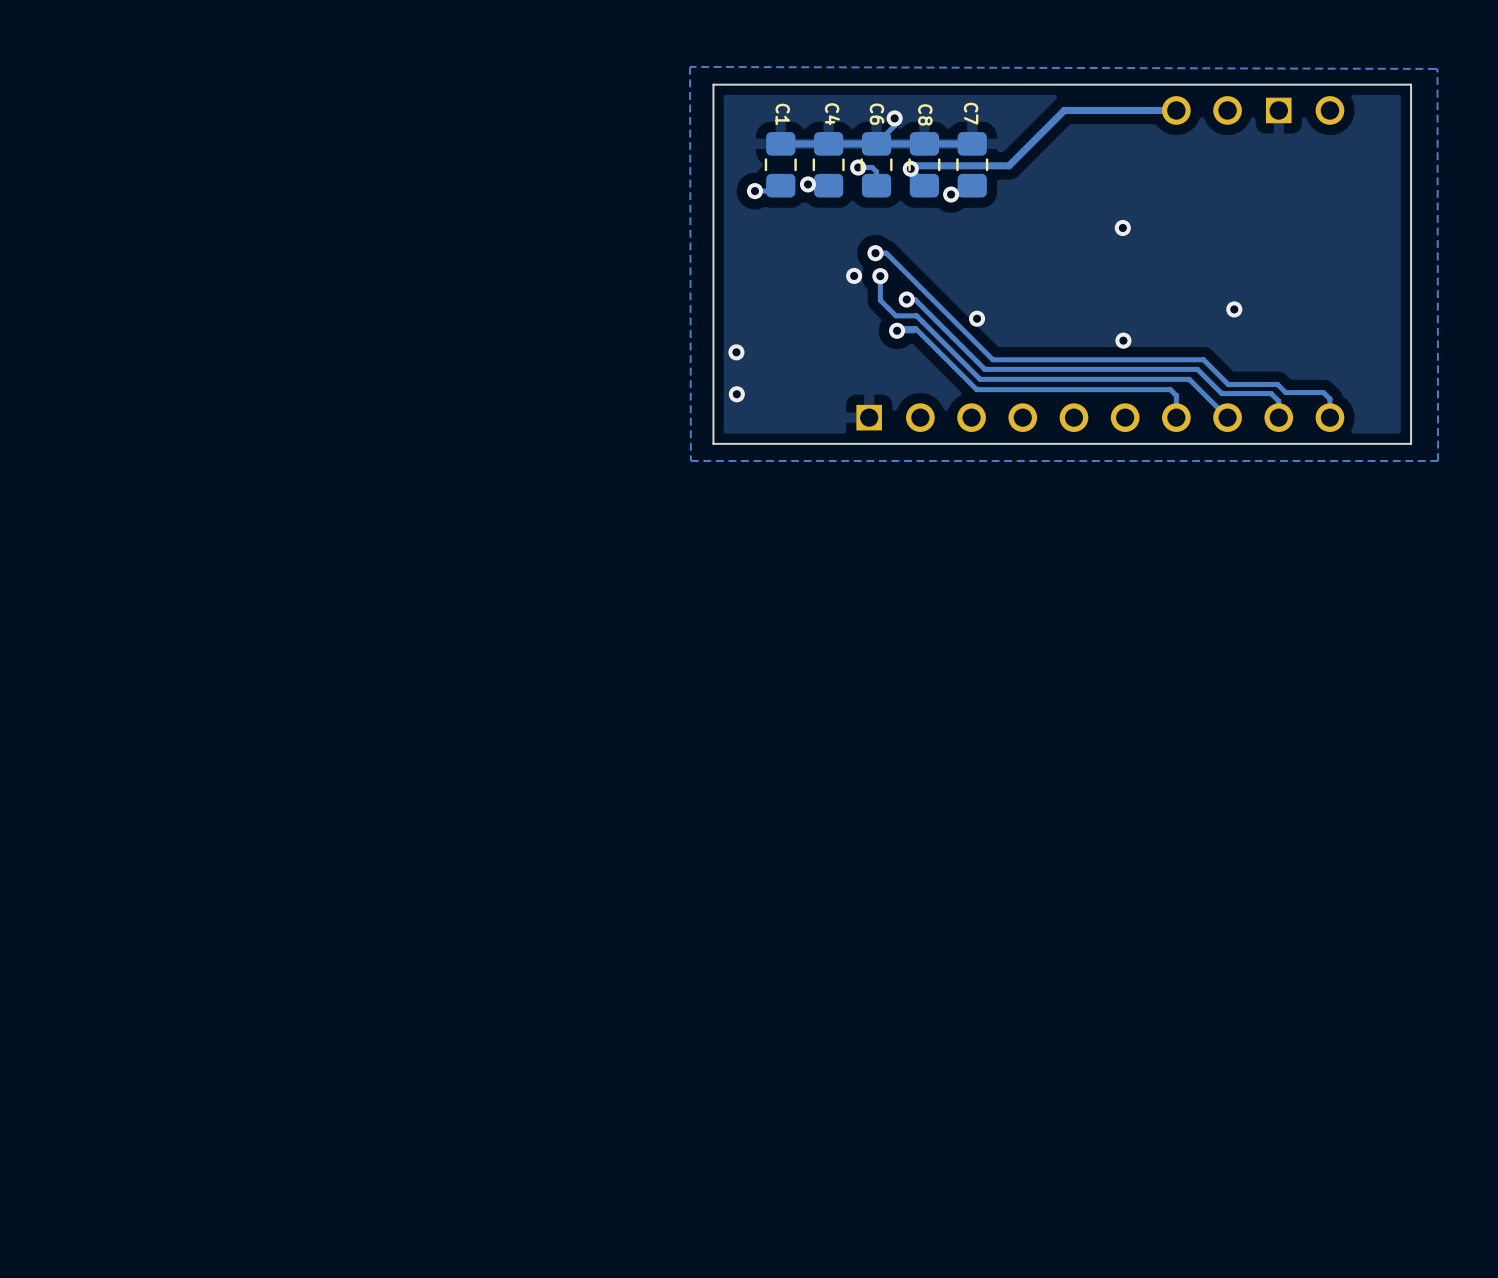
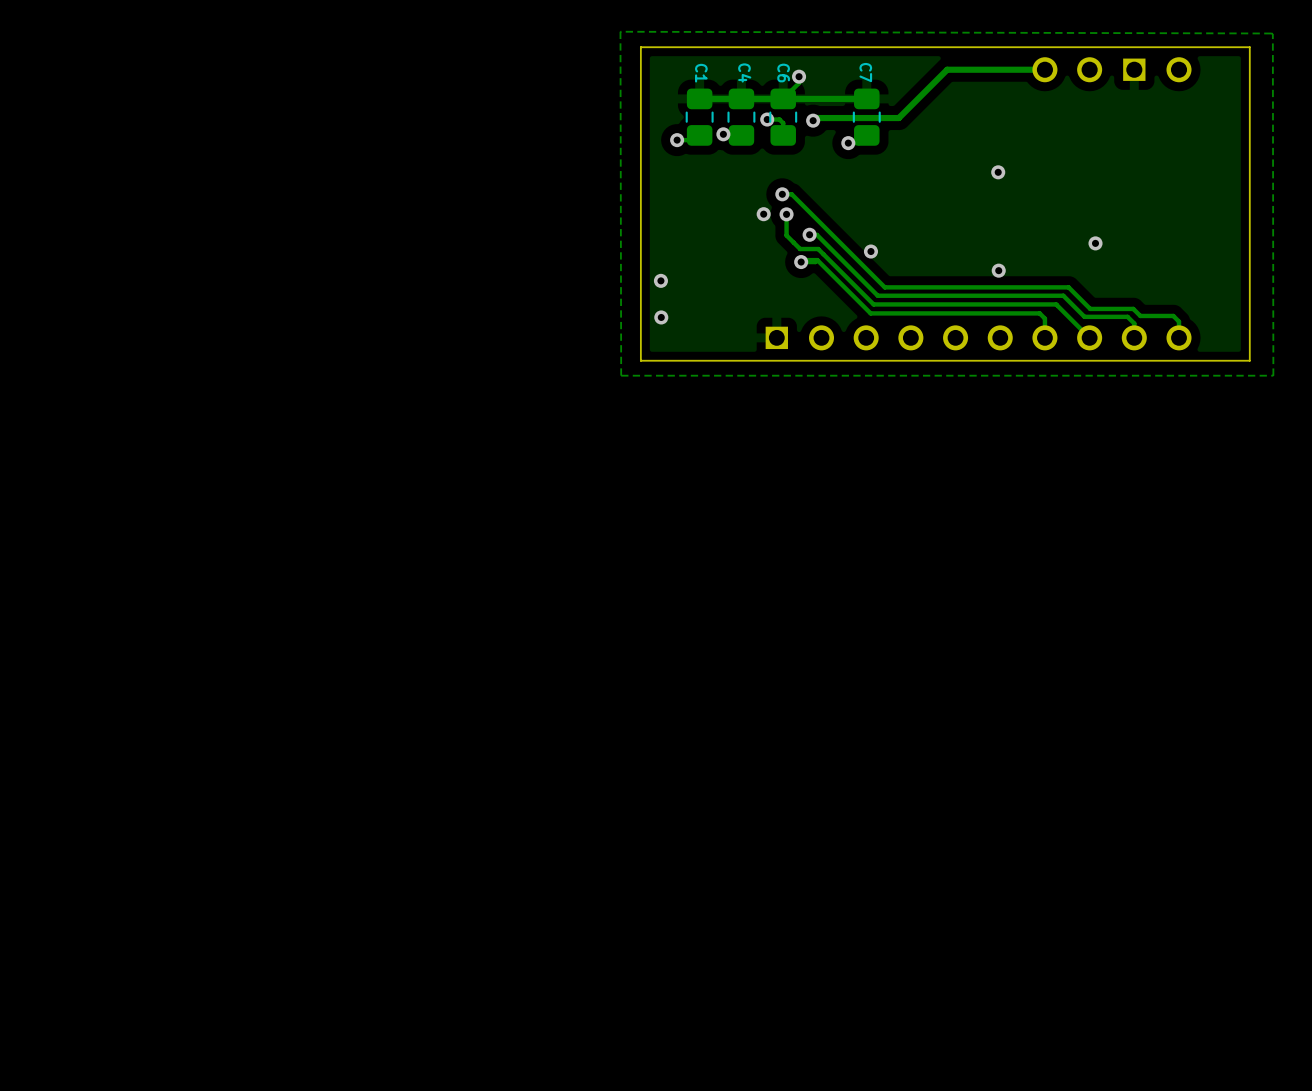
C8: (924, 164) -> none

